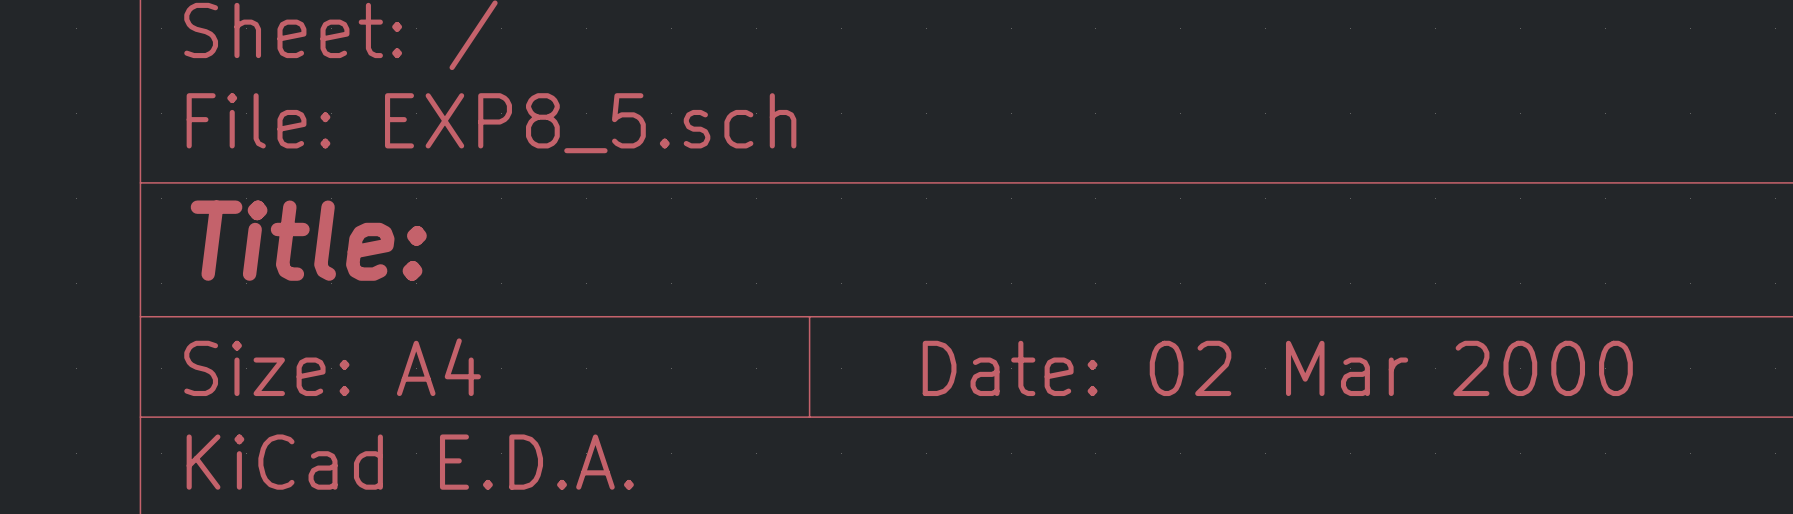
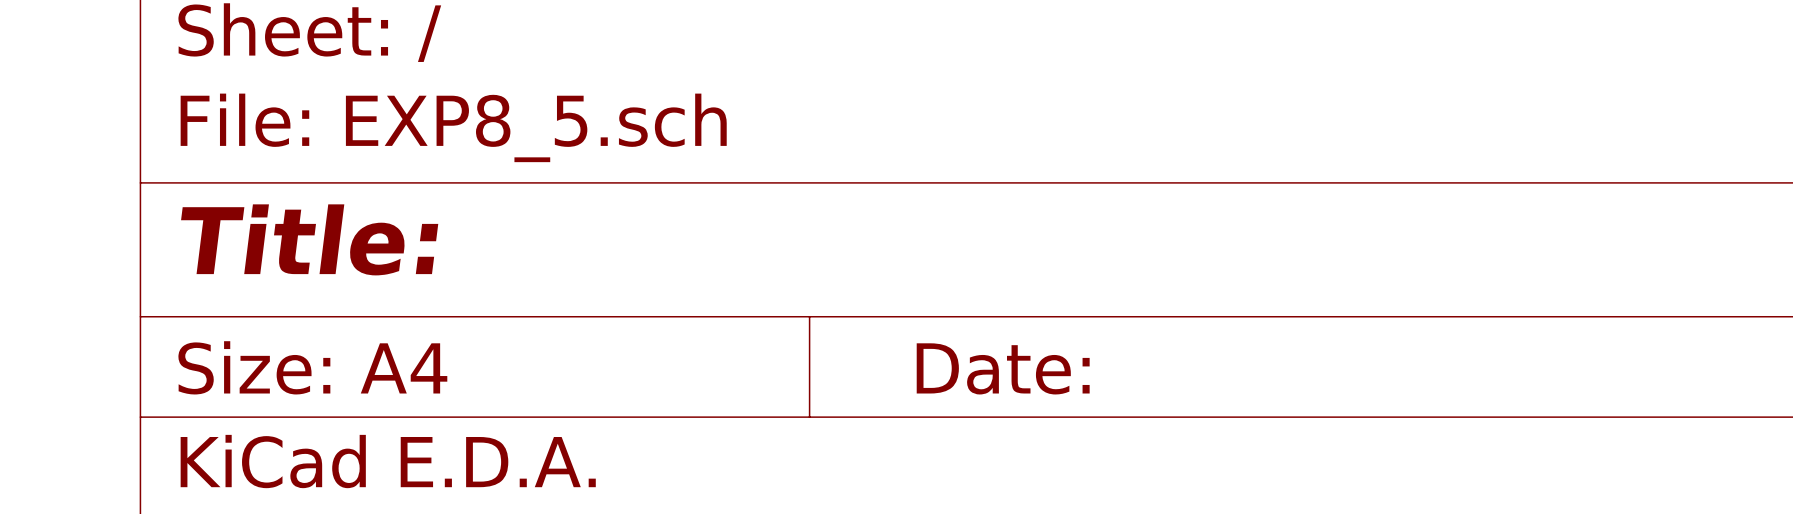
title block: Date: 02 Mar 2000 (1277, 368) -> Date: (1003, 368)

